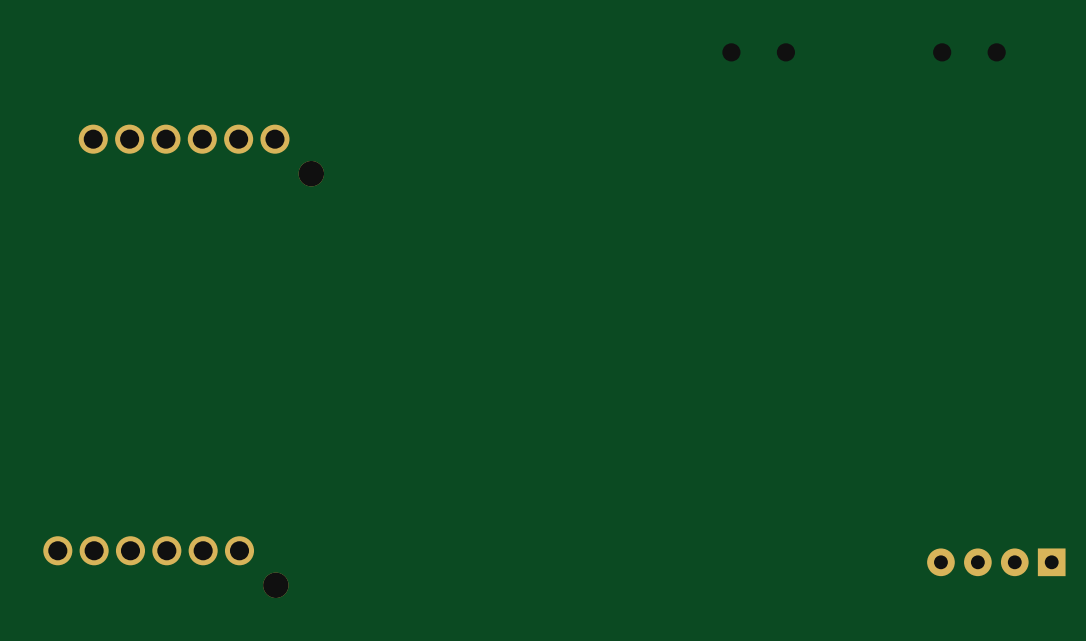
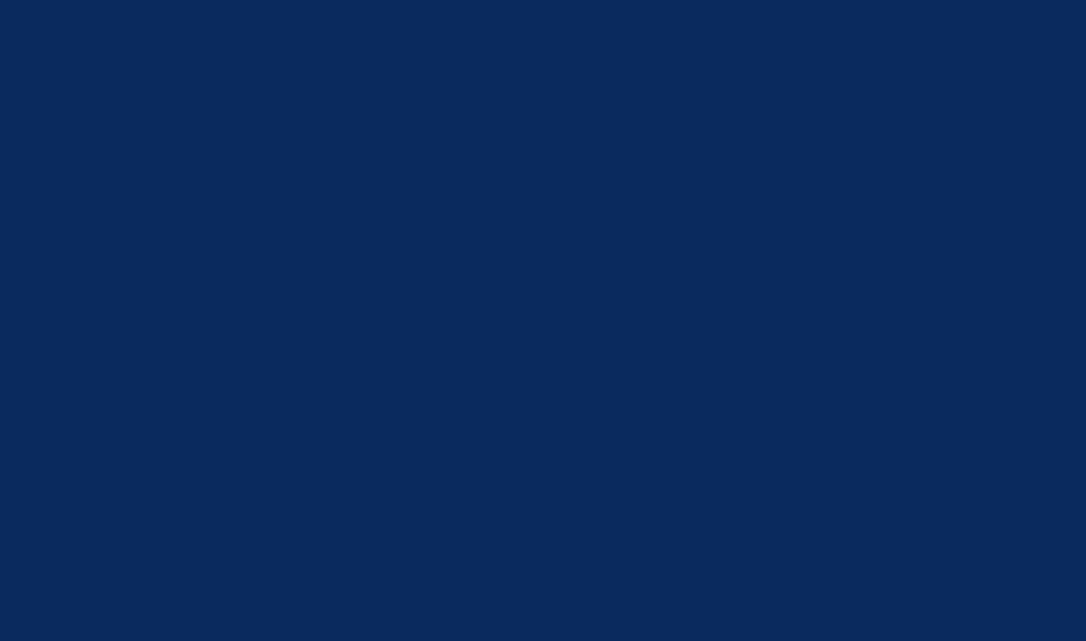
part: (758, 52) -> none
part: (969, 52) -> none
part: (201, 155) -> none
part: (996, 562) -> none
part: (165, 567) -> none

